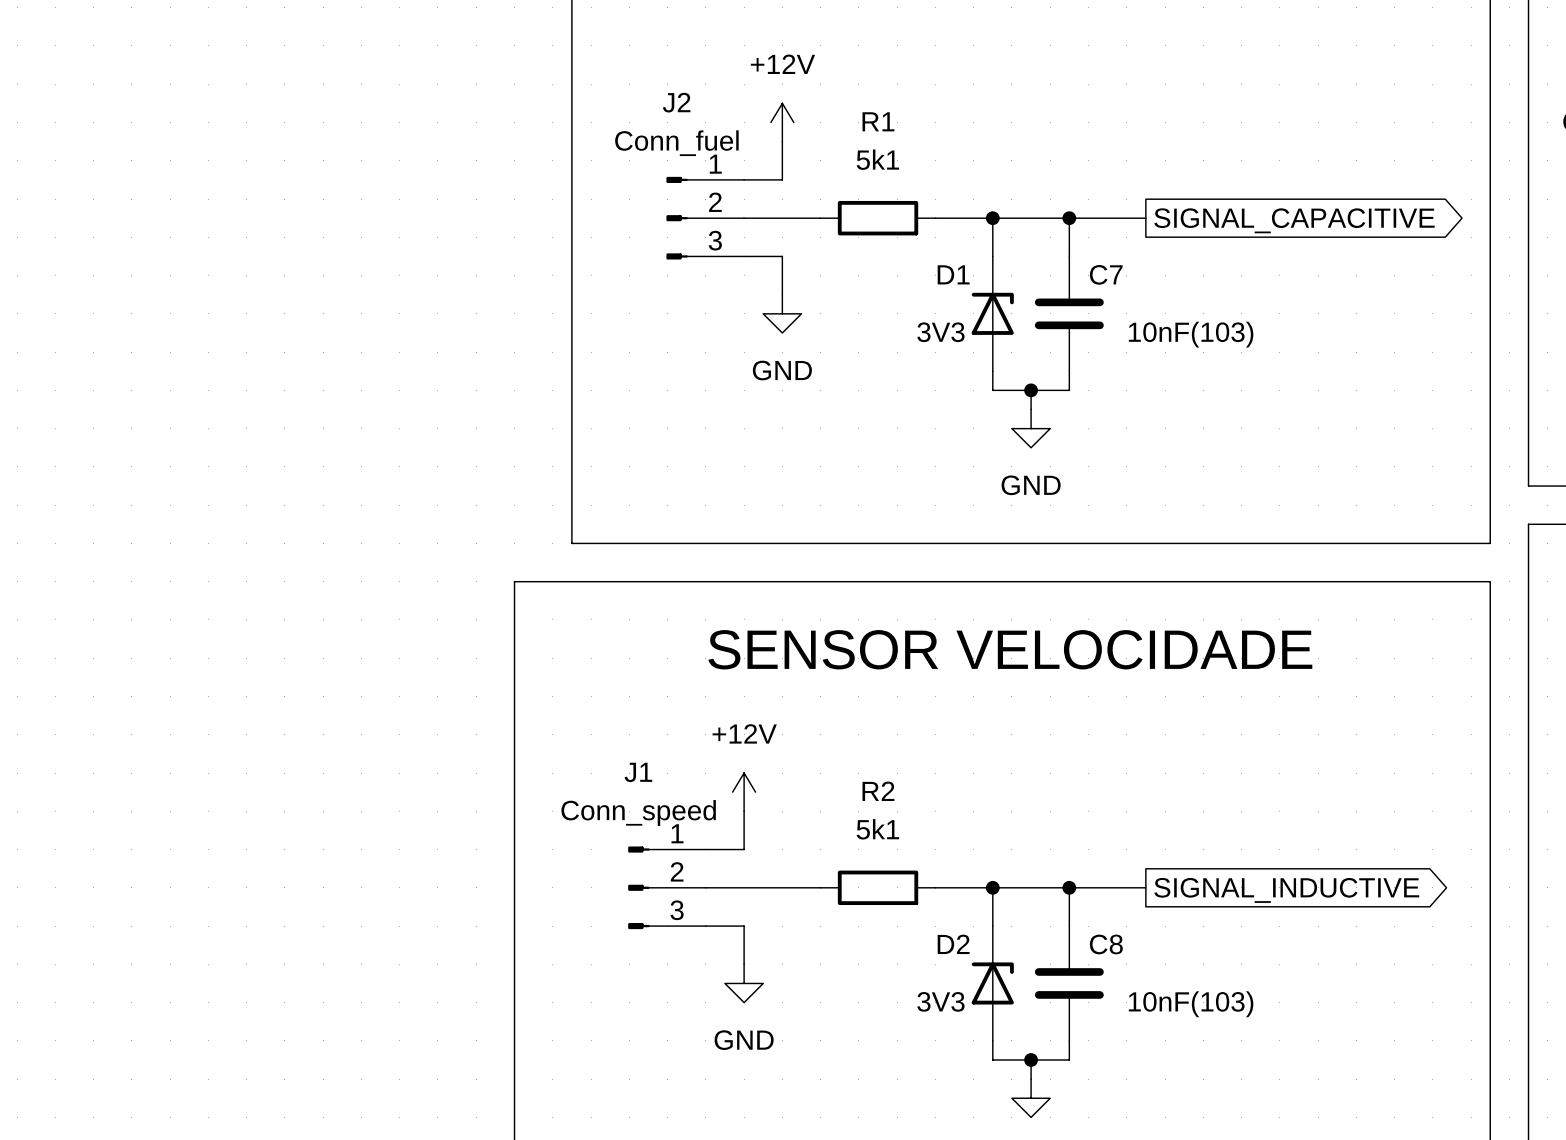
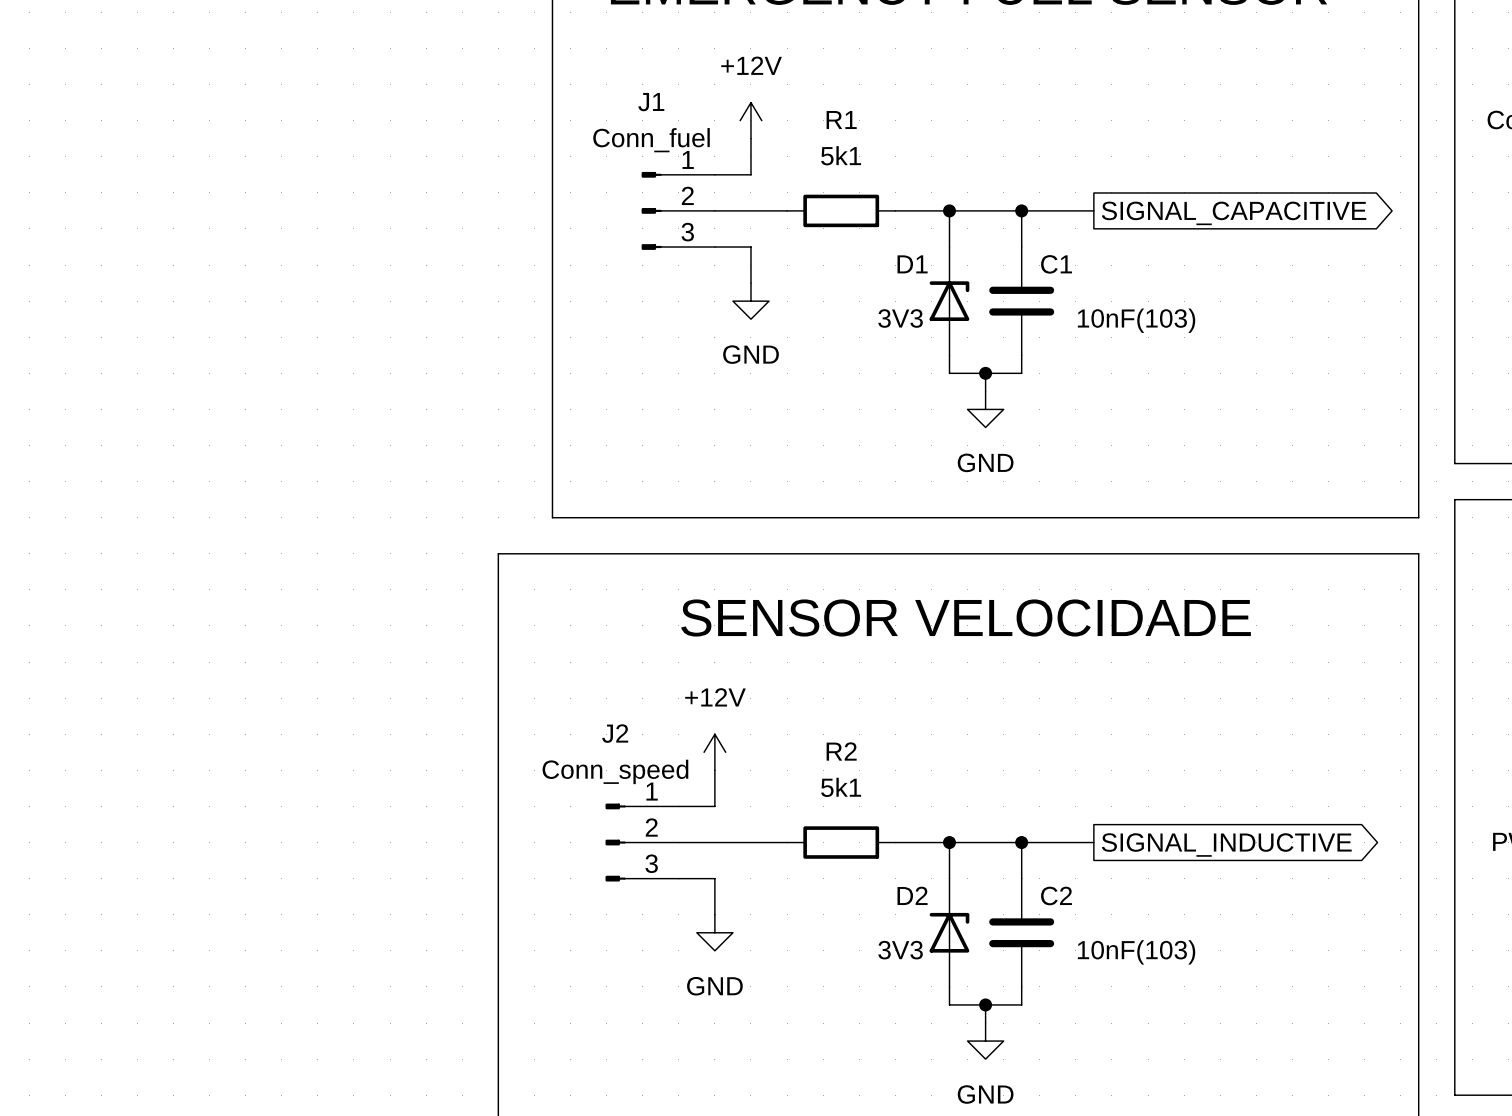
J2 name: J2 (676, 102) -> J1 (651, 102)
C7 name: C7 (1106, 274) -> C1 (1056, 264)
J1 name: J1 (638, 772) -> J2 (615, 733)
C8 name: C8 (1106, 944) -> C2 (1056, 896)

